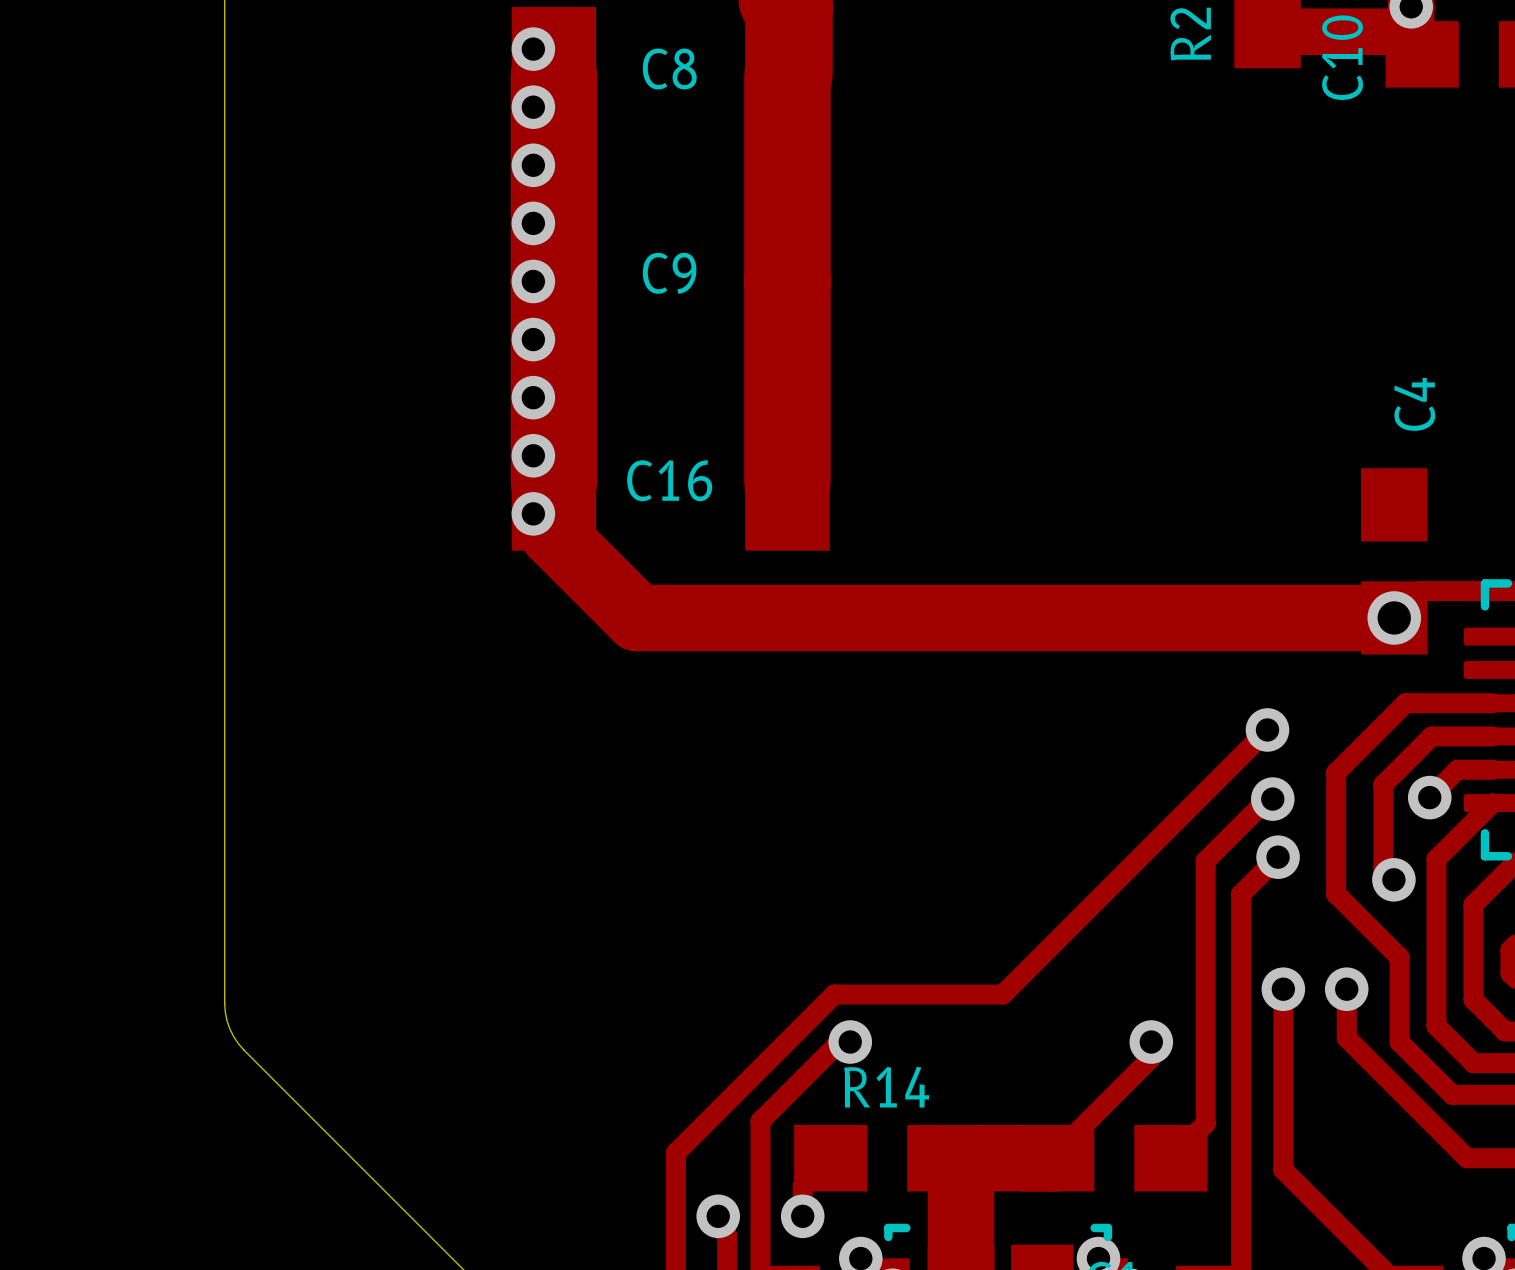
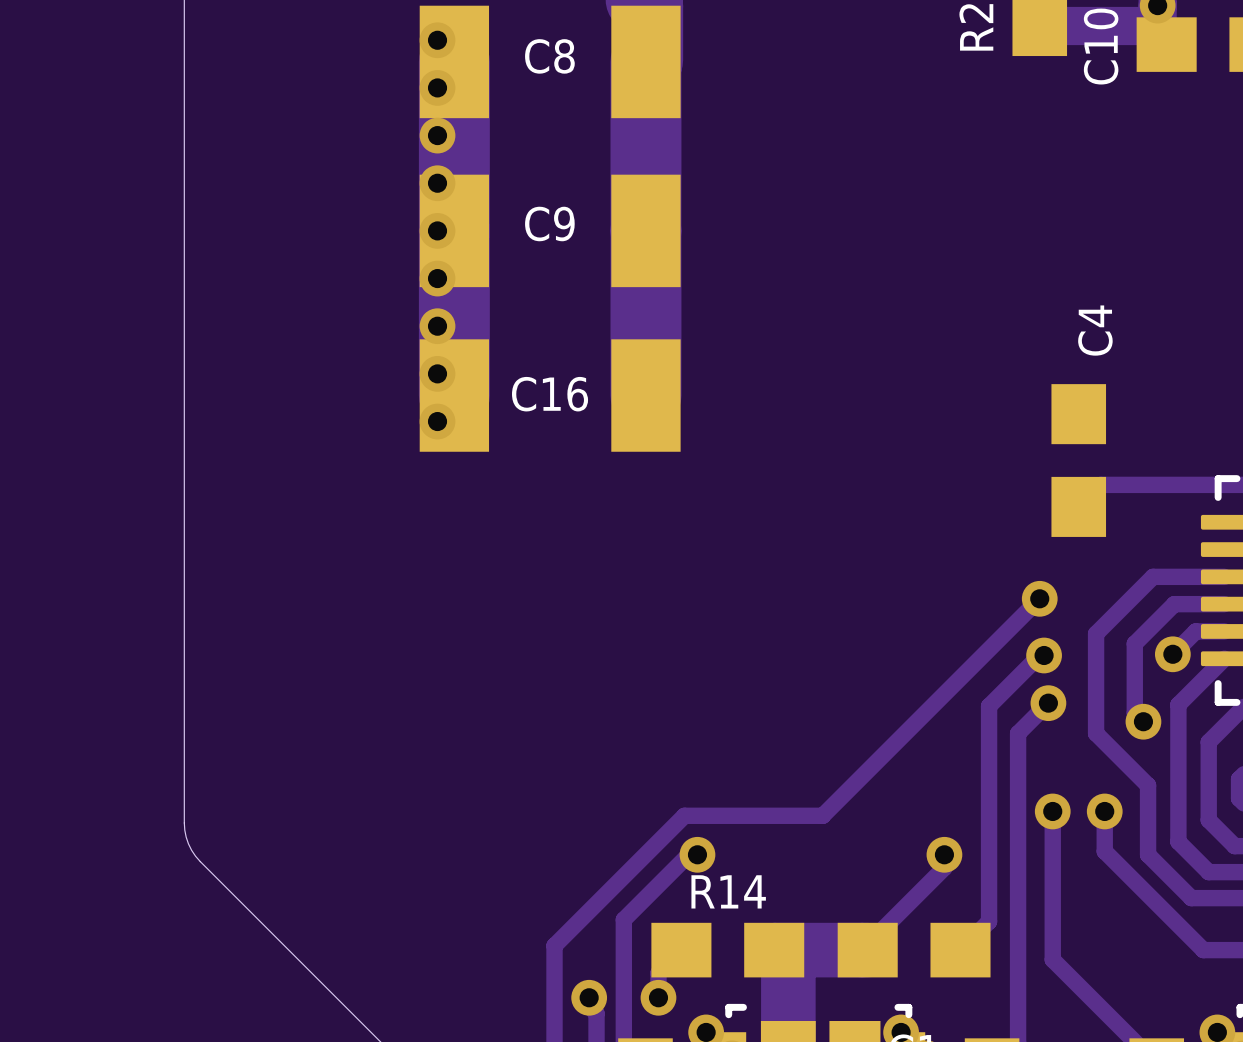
track: (553, 482) (553, 534) (637, 617) (1394, 617) (1421, 591) -> (1078, 506) (1100, 484) (1165, 484)
C4 position: (1394, 561) -> (1078, 460)
via: (1394, 617) -> none

